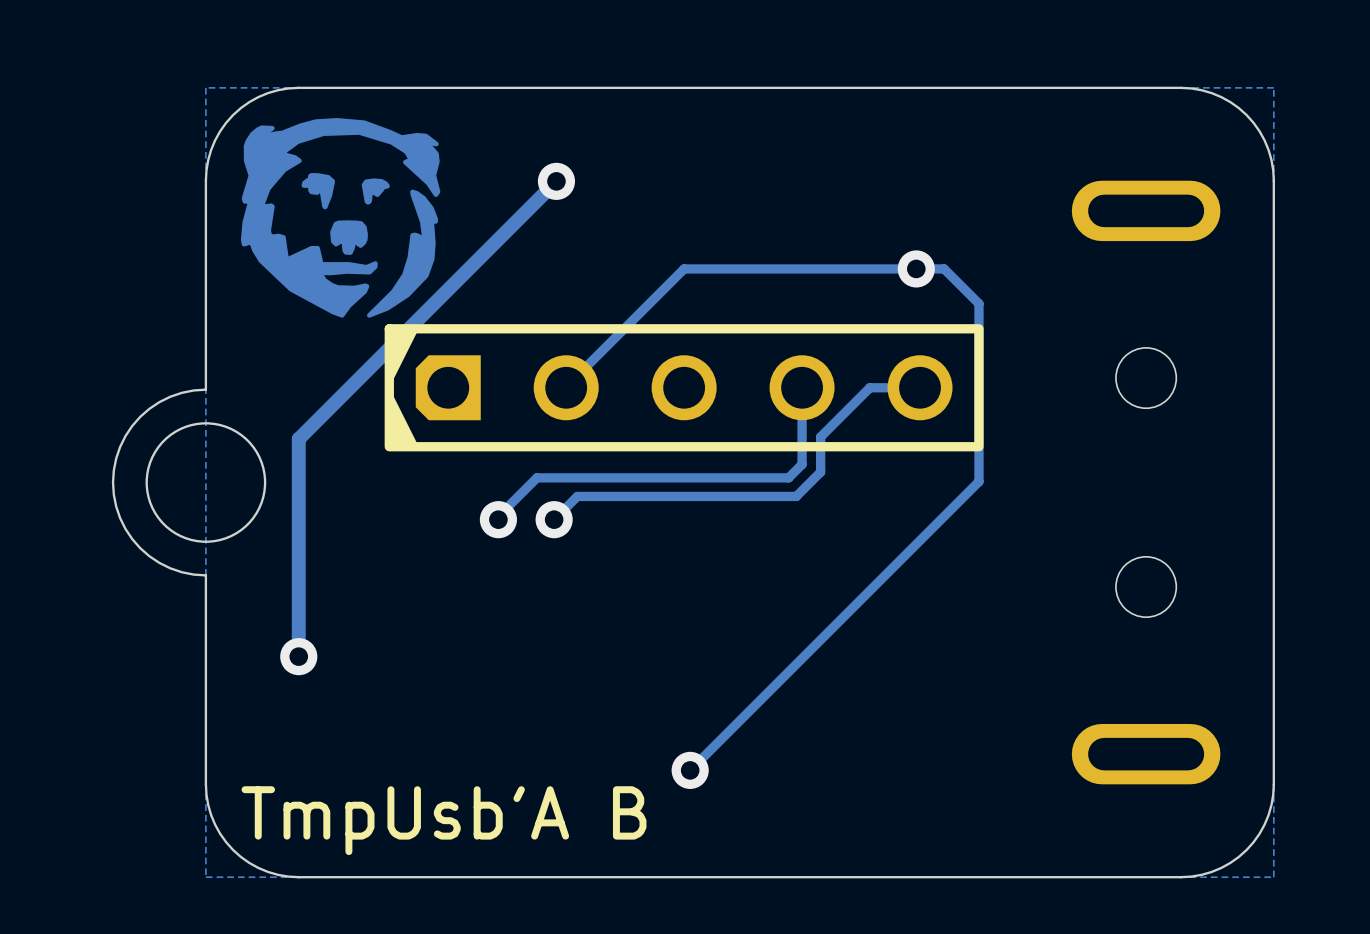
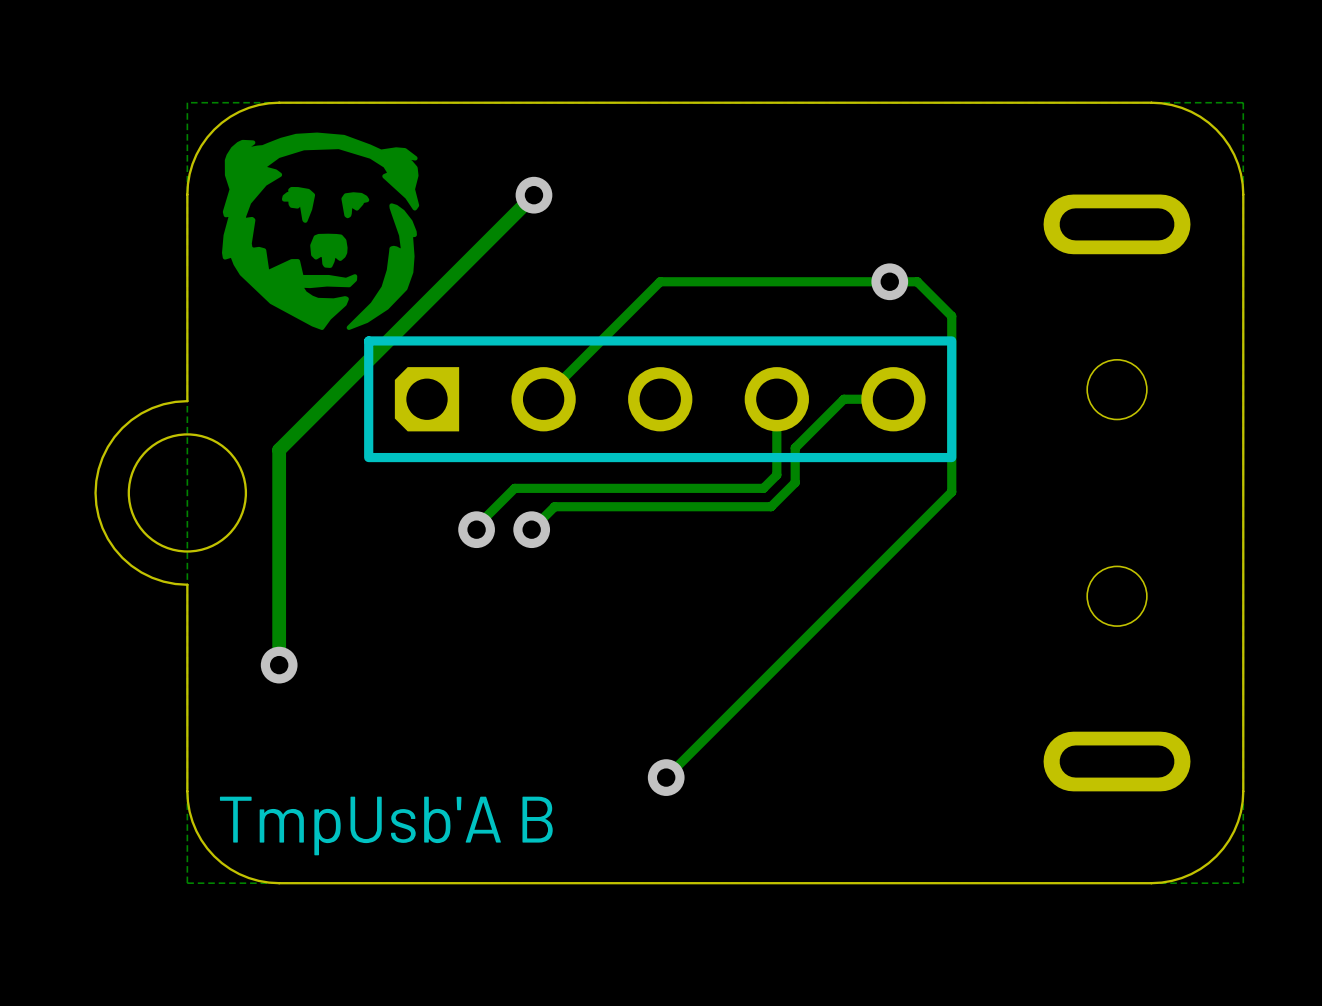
part footprint: [384, 324, 984, 452] -> [364, 336, 957, 463]

